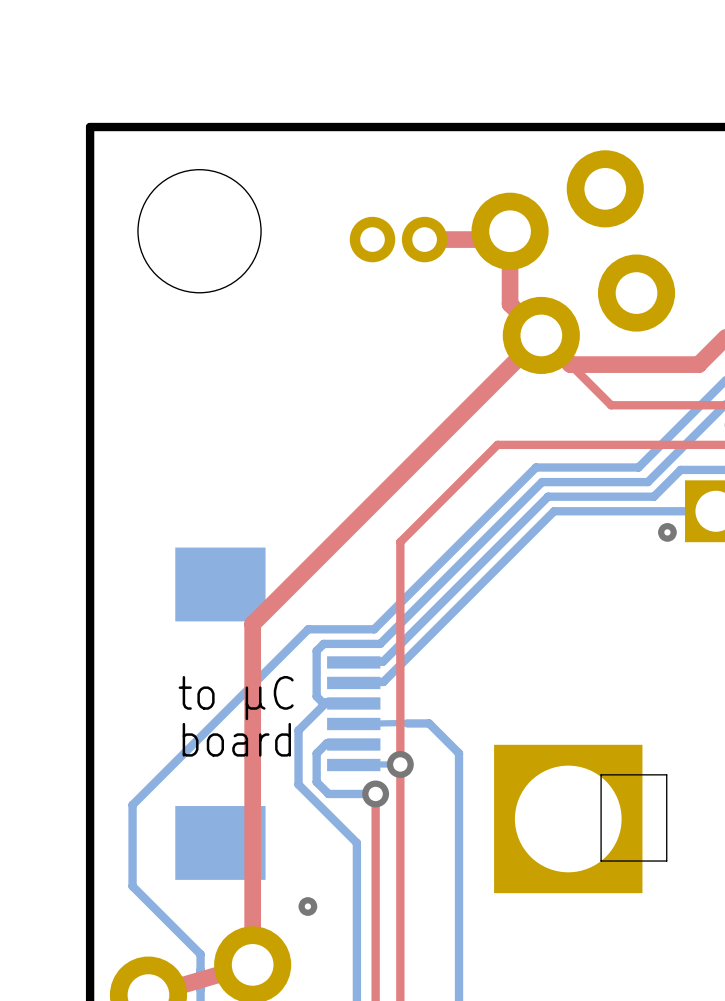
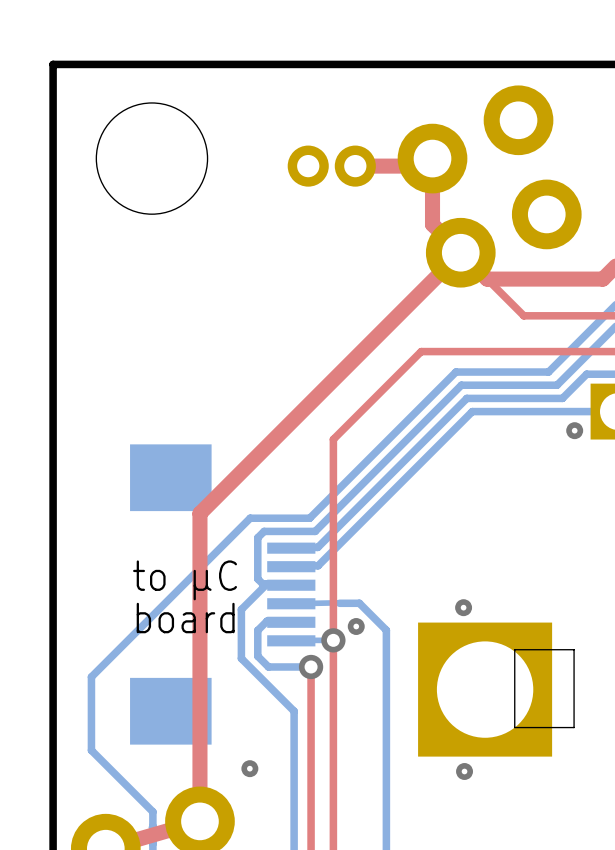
via: none -> (463, 607)
via: none -> (356, 626)
via: none -> (464, 771)

